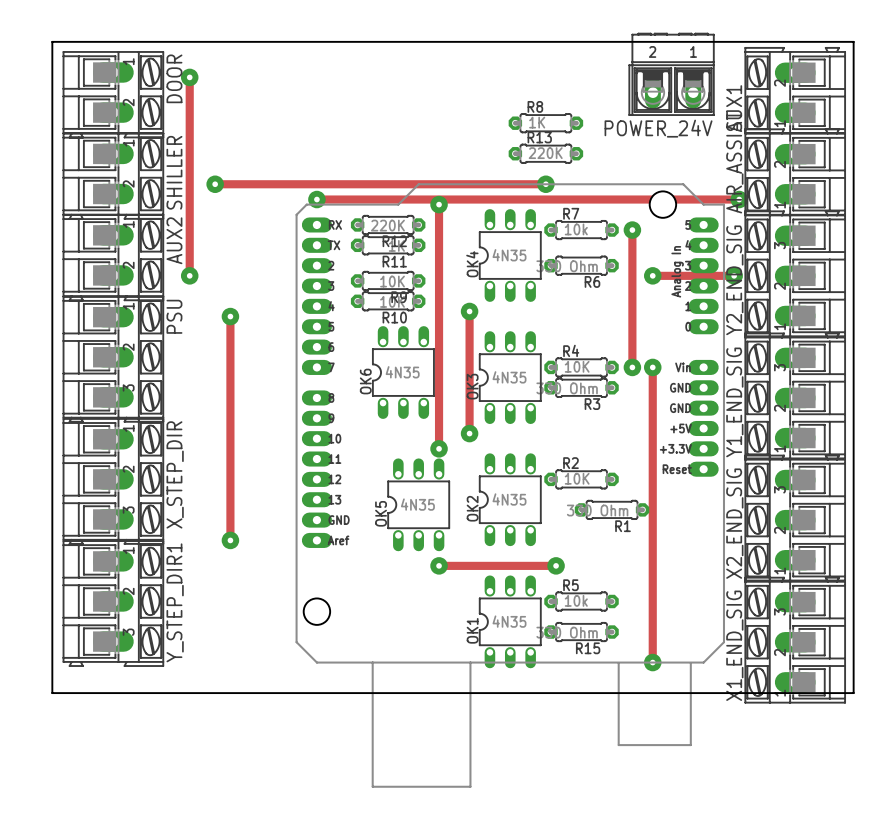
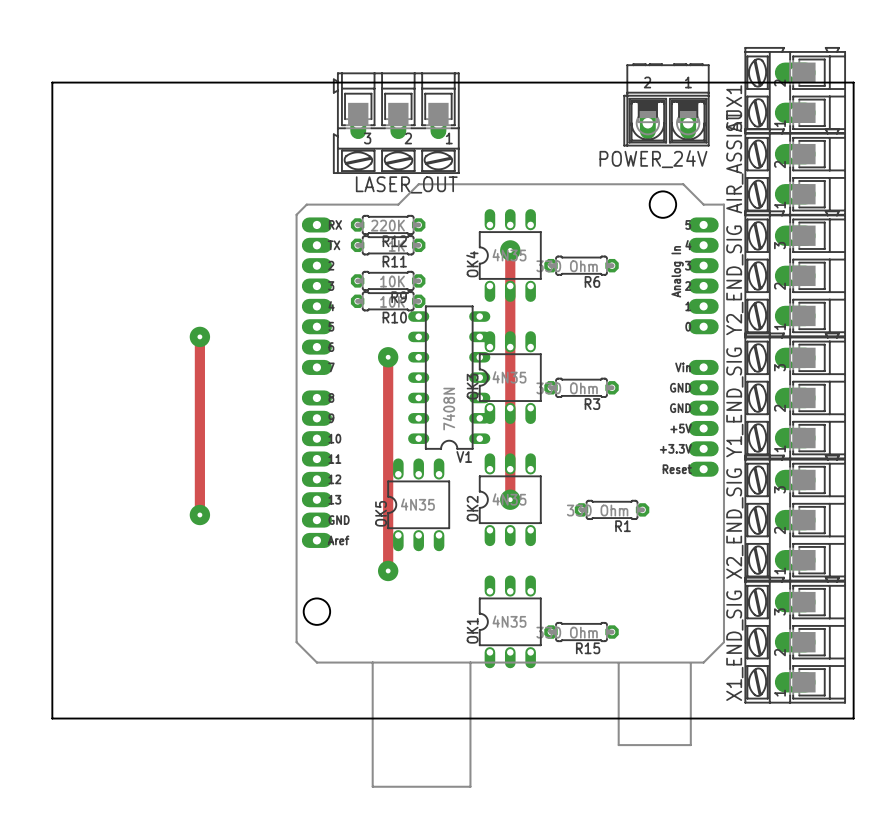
POWER_24V position: (671, 74) -> (666, 104)
track: (189, 77) (189, 275) -> none
via: (189, 77) -> none
board edge: (52, 82) (52, 41) (853, 41) (853, 82) -> (52, 82) (853, 82)
DOOR: (113, 94) -> none
LASER_OUT: none -> (396, 123)
R8: 1K (545, 123) -> none
R13: 220K (545, 153) -> none
SHILLER: (113, 176) -> none
track: (215, 184) (545, 184) -> none
via: (215, 184) -> none
via: (545, 184) -> none
track: (316, 199) (739, 199) -> none
via: (316, 199) -> none
via: (739, 199) -> none
track: (439, 204) (439, 448) -> none
via: (439, 204) -> none
R7: 10k (581, 230) -> none
track: (632, 230) (632, 367) -> none
via: (632, 230) -> none
track: none -> (510, 250) (510, 499)
via: none -> (510, 250)
AUX2: (113, 257) -> none
via: (189, 275) -> none
track: (652, 275) (734, 275) -> none
via: (652, 275) -> none
via: (734, 275) -> none
track: (469, 311) (469, 433) -> none
via: (469, 311) -> none
track: (230, 316) (230, 540) -> none
via: (230, 316) -> none
track: none -> (199, 336) (199, 514)
via: none -> (199, 336)
track: none -> (388, 357) (388, 570)
via: none -> (388, 357)
PSU: (113, 359) -> none
R4: 10K (581, 367) -> none
via: (632, 367) -> none
track: (652, 367) (652, 662) -> none
via: (652, 367) -> none
OK6: 4N35 (403, 372) -> none
V1: none -> 7408N (449, 377)
via: (469, 433) -> none
via: (439, 448) -> none
R2: 10K (581, 479) -> none
X_STEP_DIR: (113, 481) -> none
via: none -> (510, 499)
via: none -> (199, 514)
via: (230, 540) -> none
track: (439, 565) (556, 565) -> none
via: (439, 565) -> none
via: (556, 565) -> none
via: none -> (388, 570)
R5: 10k (581, 601) -> none
Y_STEP_DIR1: (113, 603) -> none
via: (652, 662) -> none
board edge: (52, 693) (853, 693) -> (52, 693) (52, 718) (853, 718) (853, 693)

